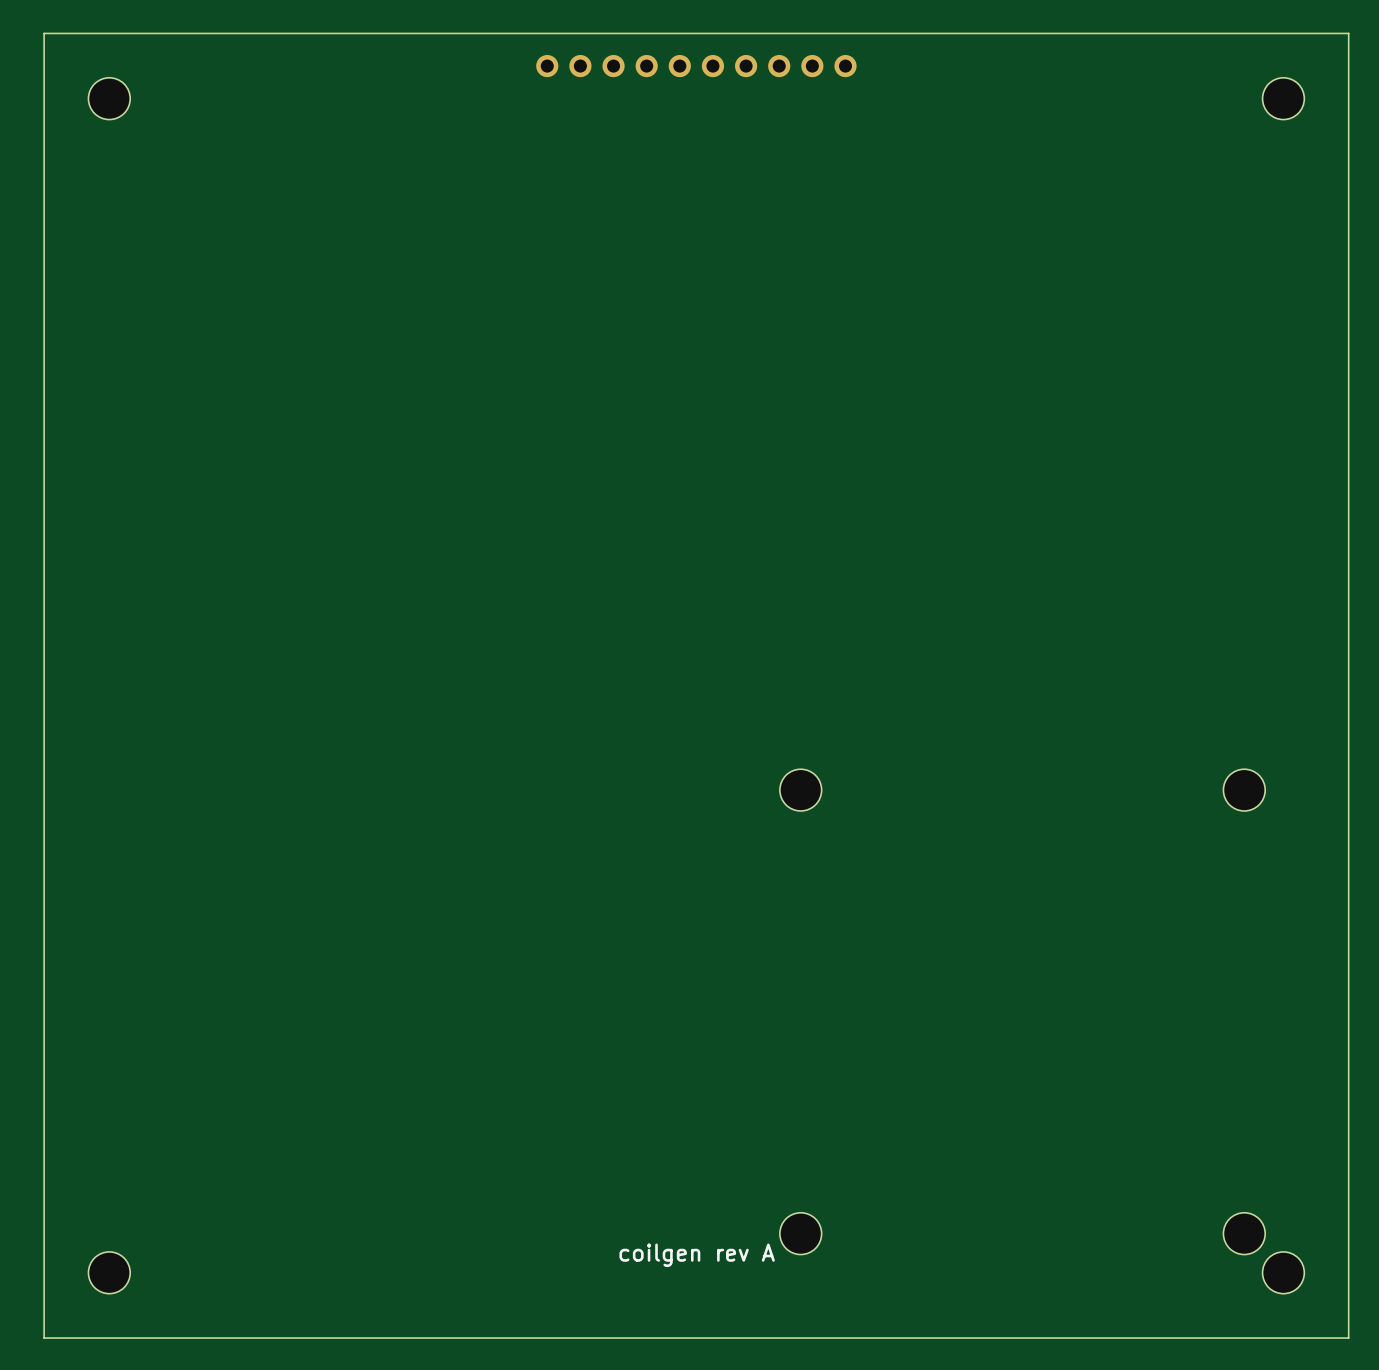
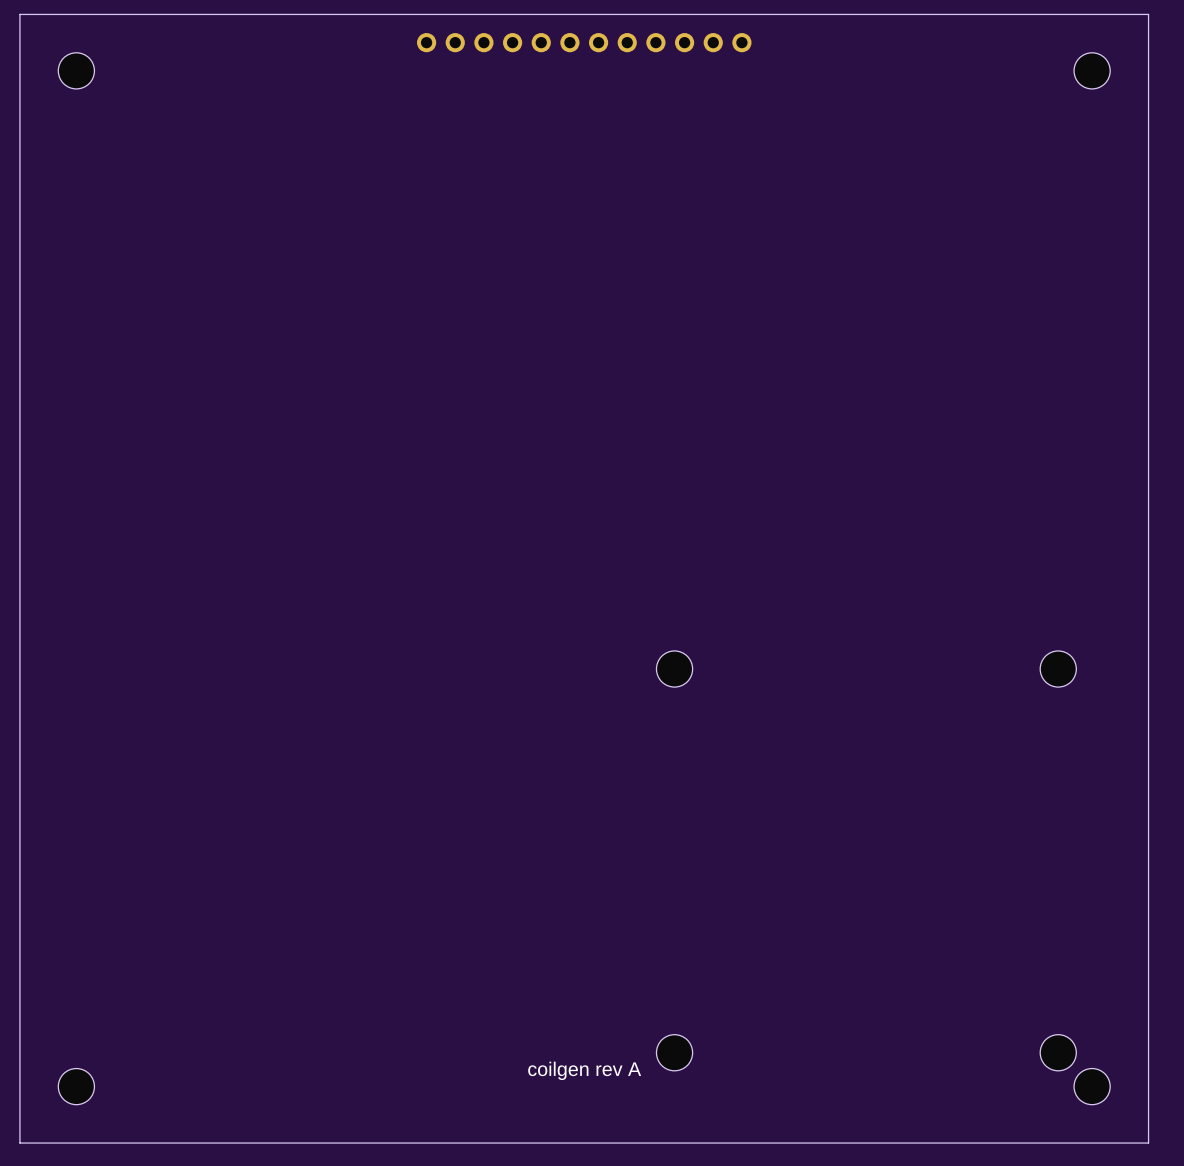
part footprint: [536, 54, 857, 78] -> [416, 33, 752, 53]

